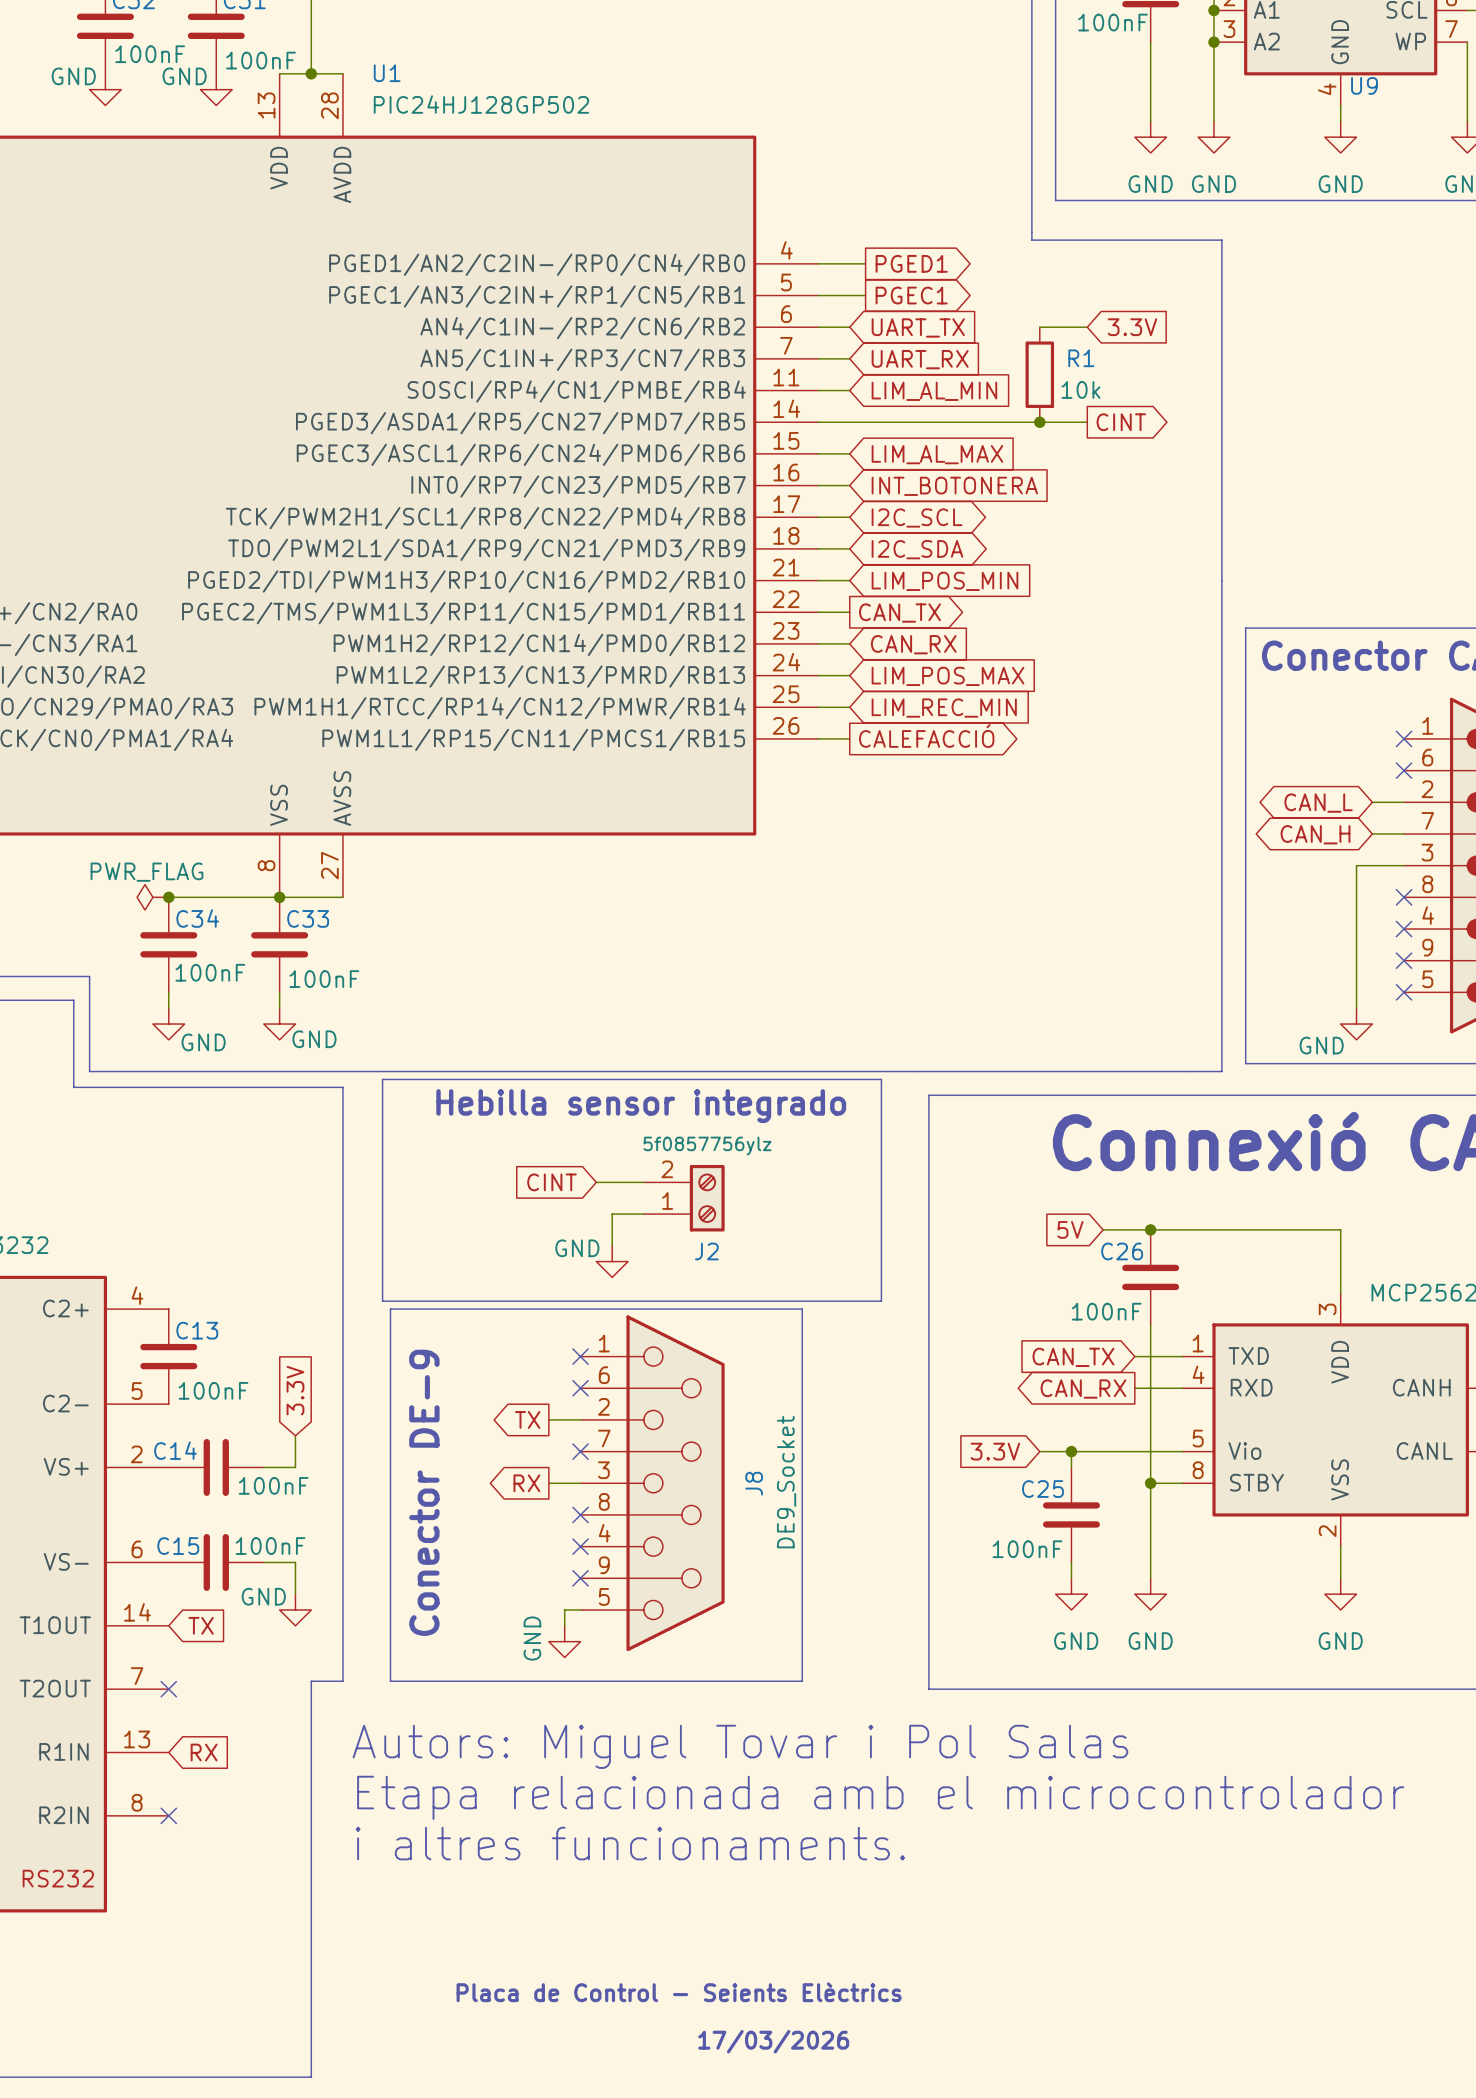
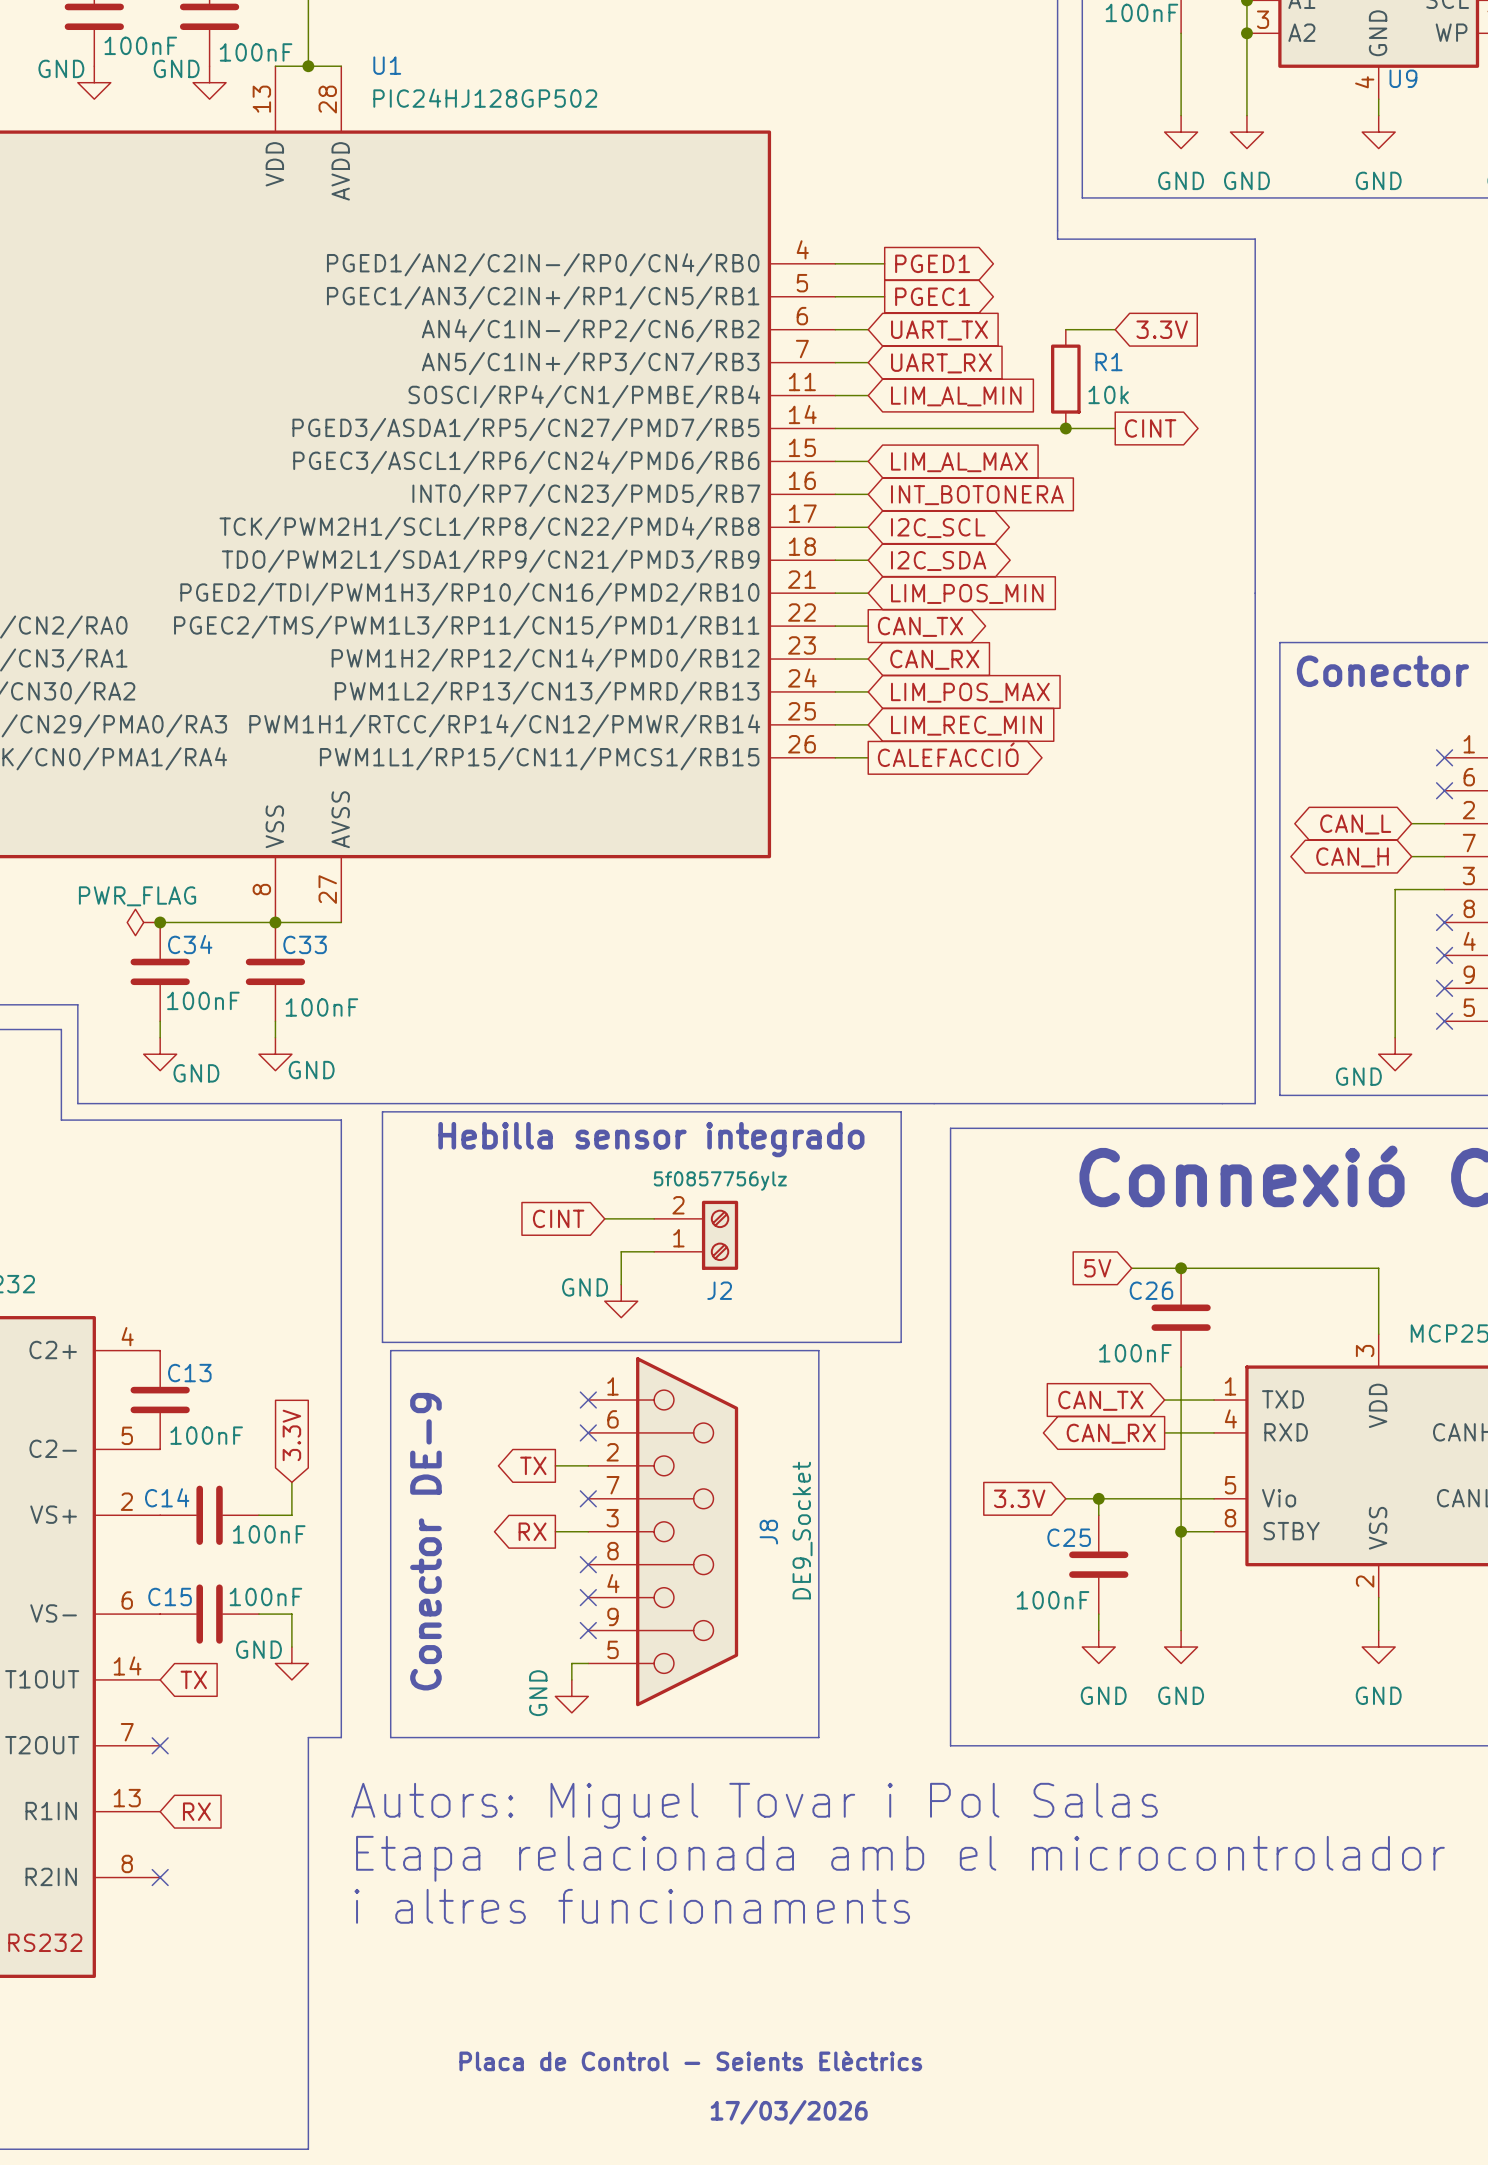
text: i altres funcionaments. (630, 1843) -> i altres funcionaments (632, 1906)

